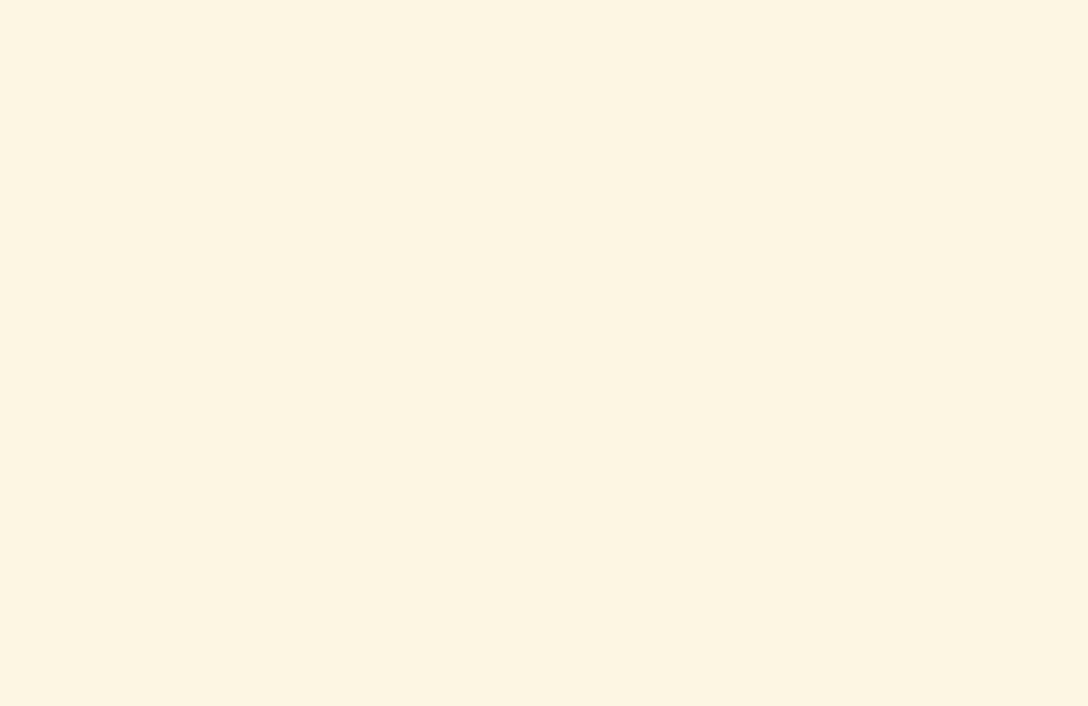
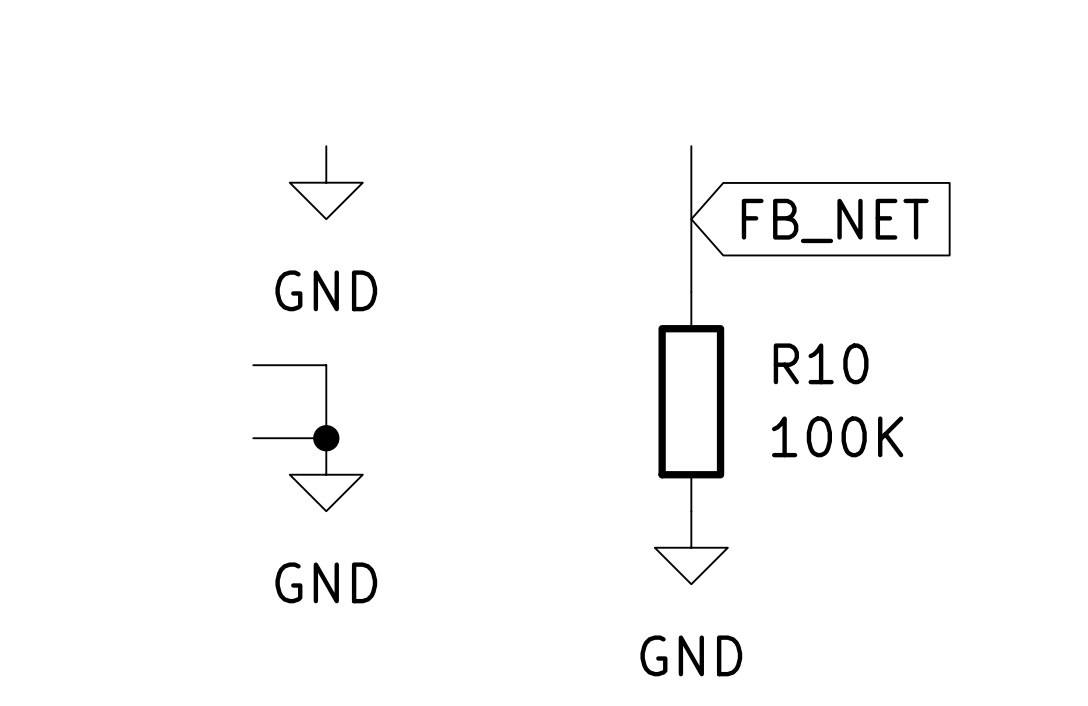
wire: none -> (691, 146) (691, 292)
power symbol: none -> GND (326, 182)
global label: none -> FB_NET (835, 220)
wire: none -> (253, 365) (326, 365) (326, 438) (253, 438)
R10: none -> 100K (691, 401)
junction: none -> (326, 438)
power symbol: none -> GND (326, 474)
power symbol: none -> GND (691, 547)

